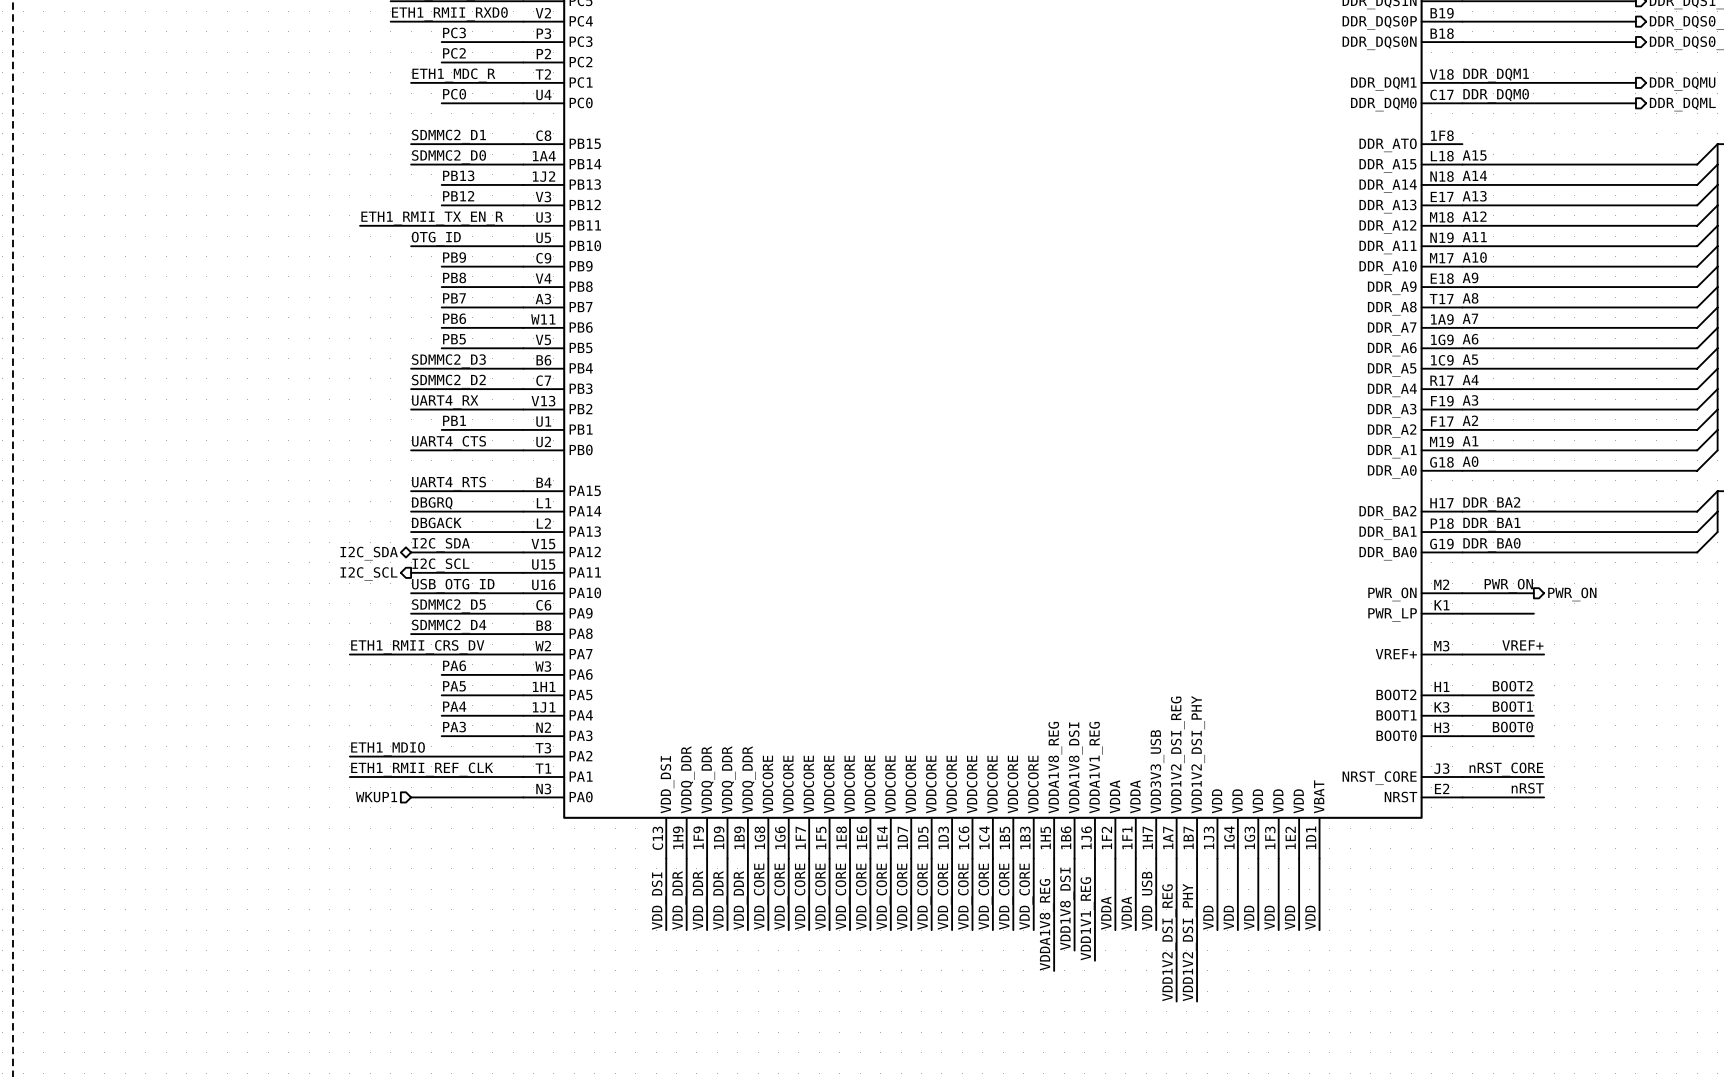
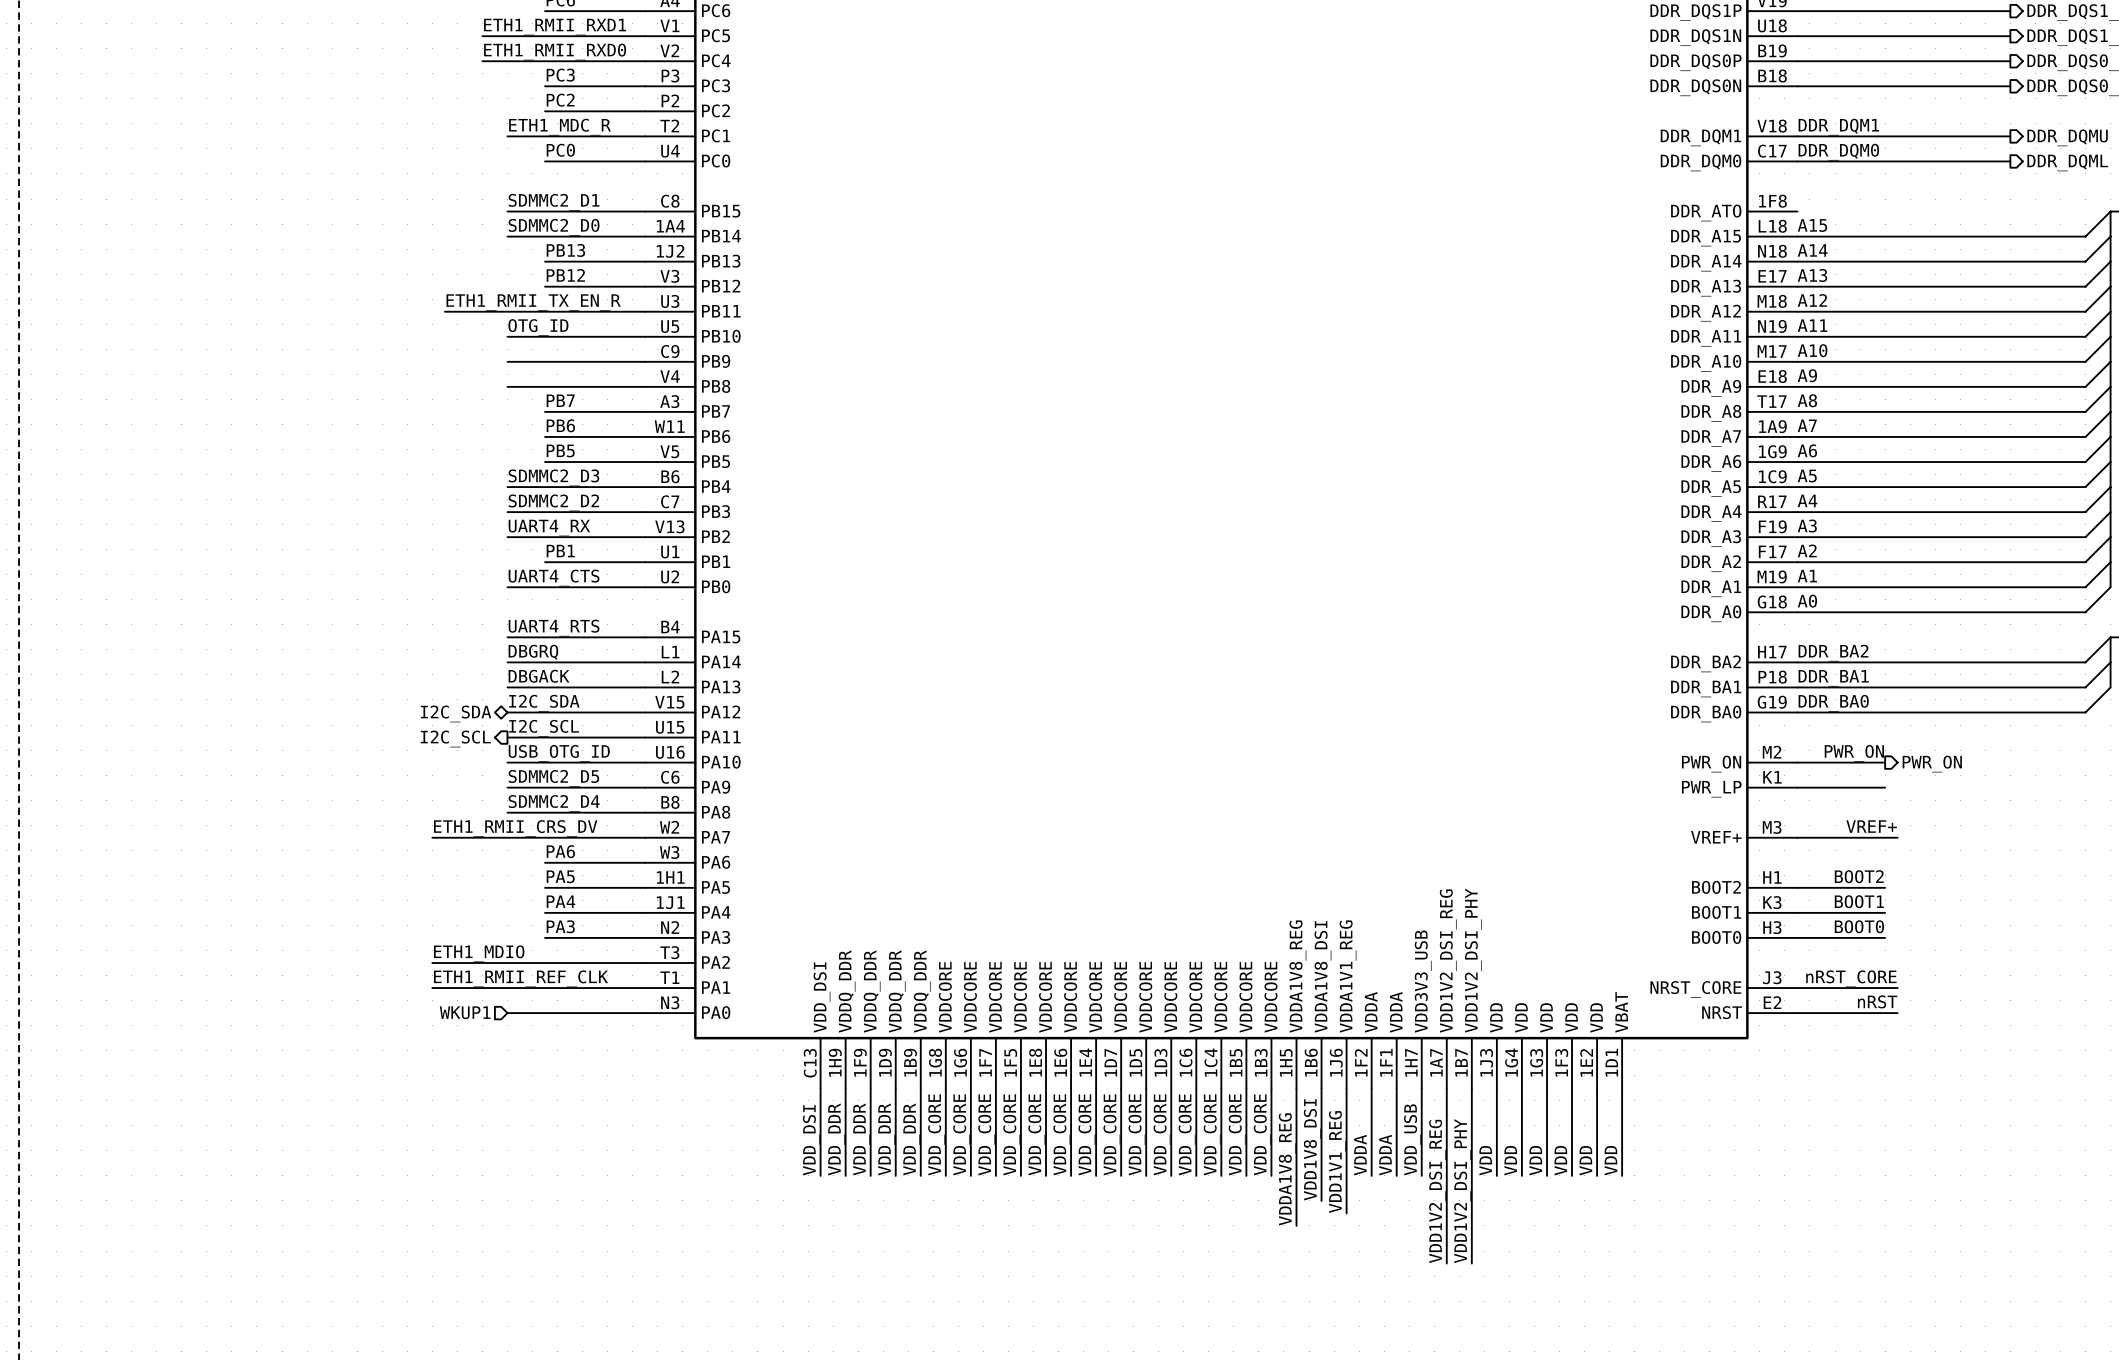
label: PB9 (454, 257) -> none
wire: none -> (507, 361) (545, 361)
label: PB8 (454, 277) -> none
wire: none -> (507, 386) (545, 386)

